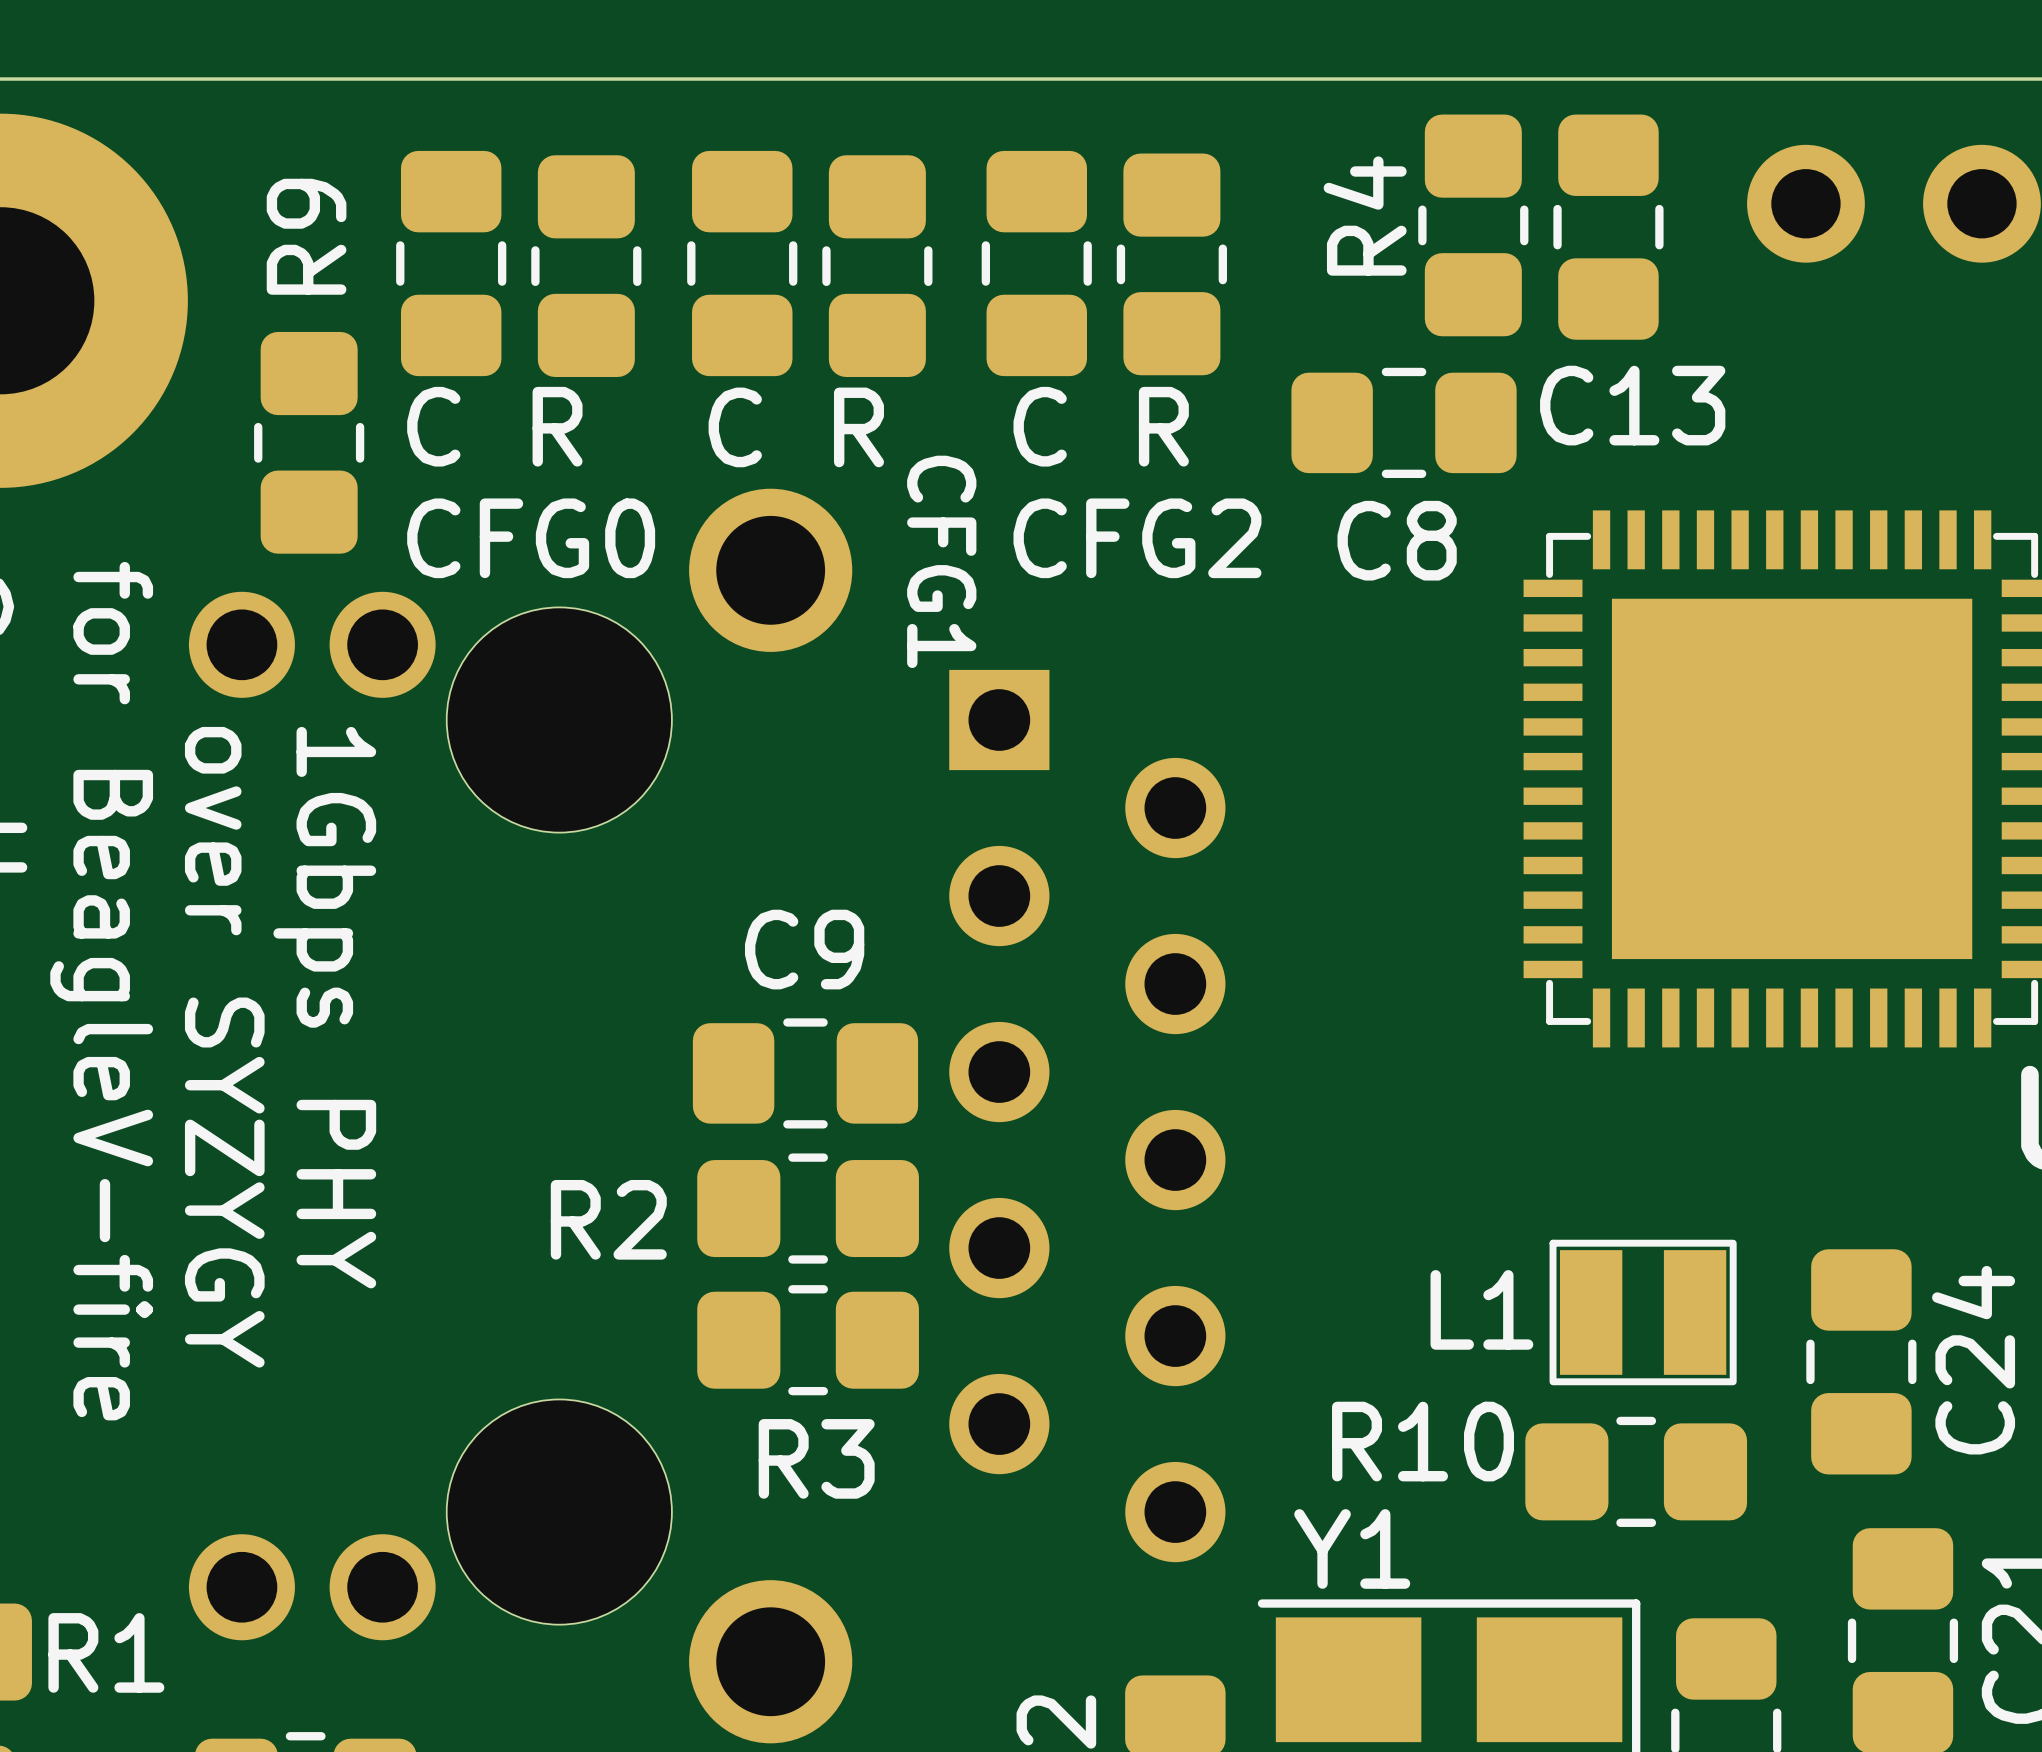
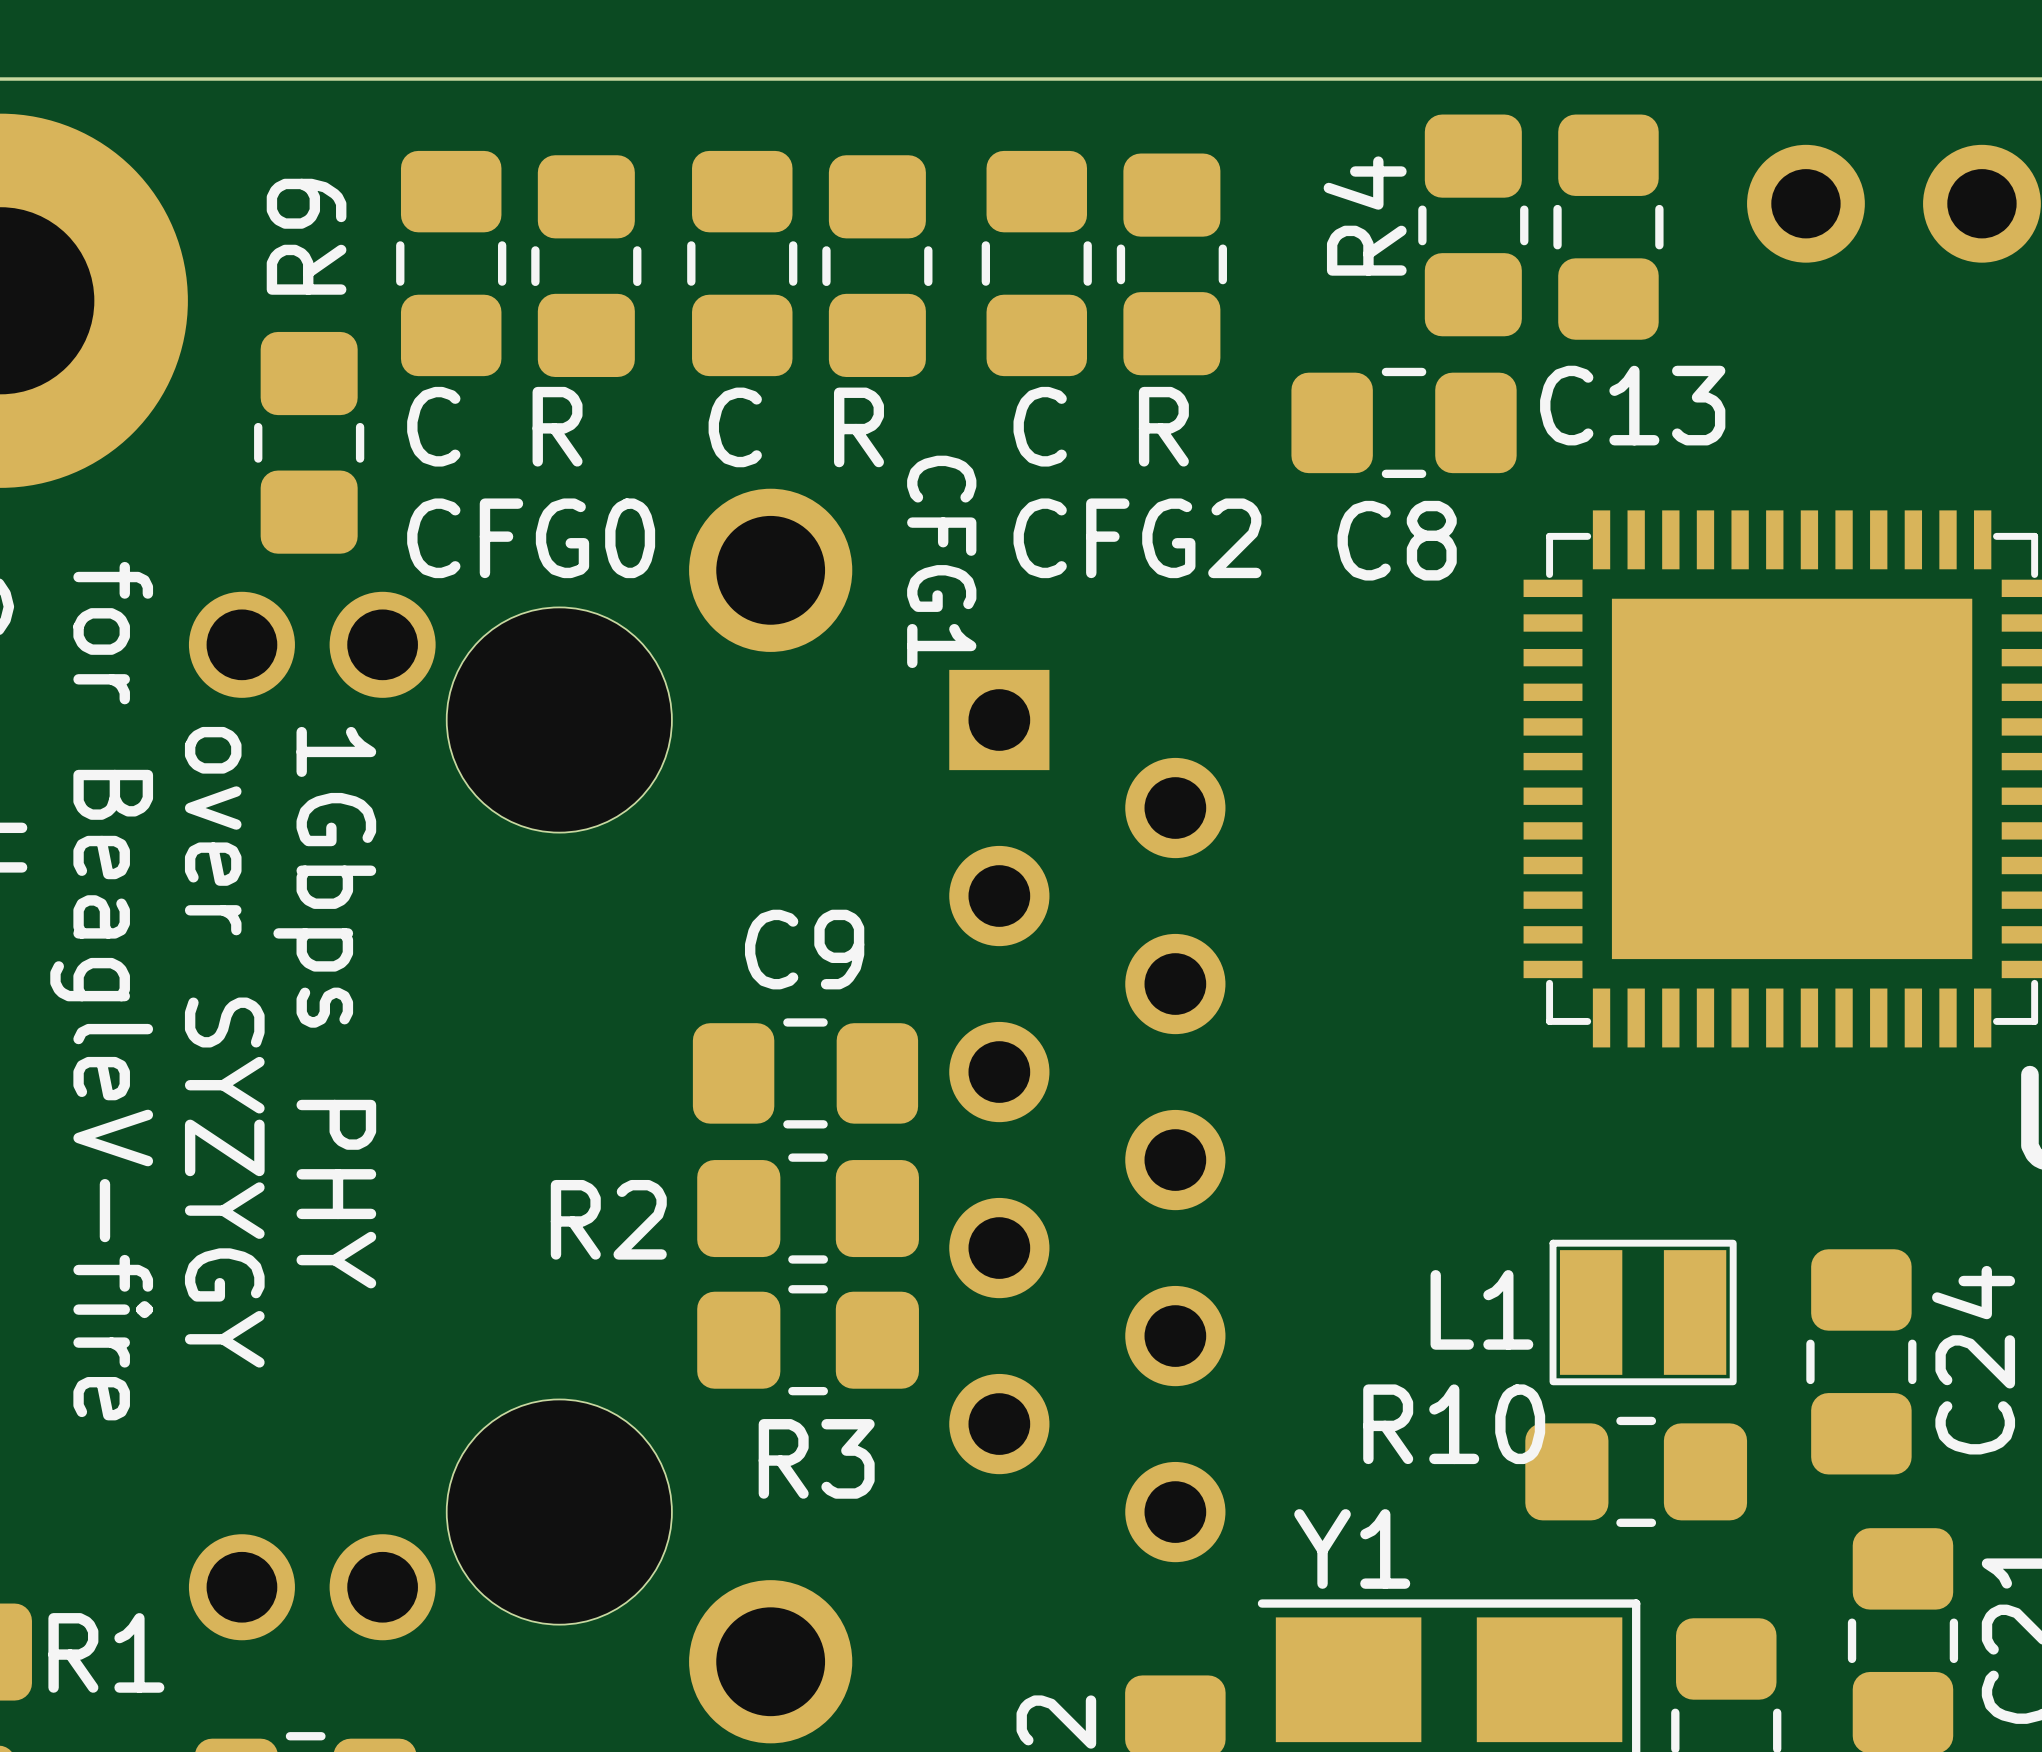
R10 name position: R10 (1423, 1441) -> R10 (1454, 1424)

